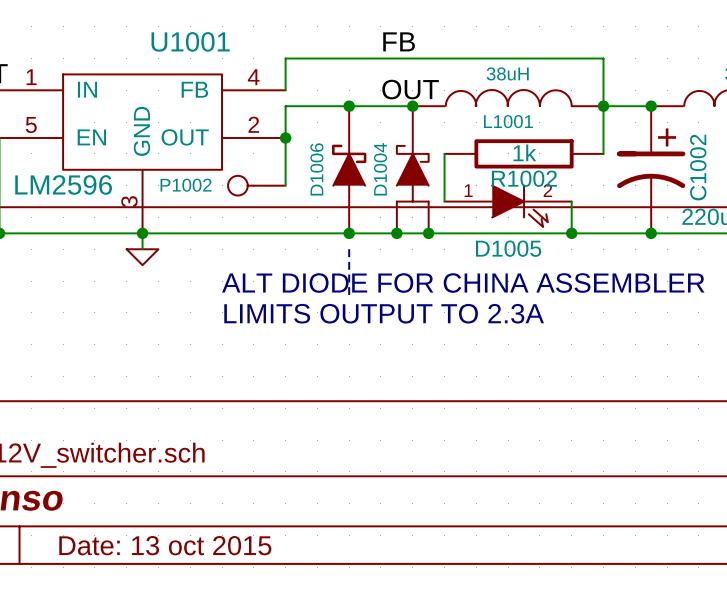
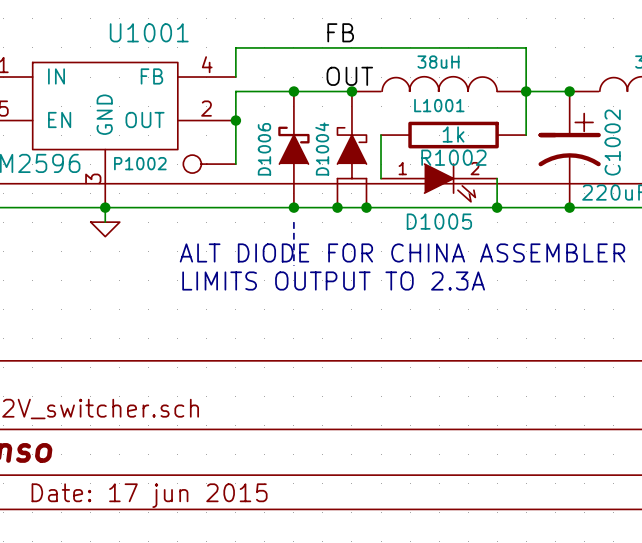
title block: Date: 13 oct 2015 (165, 545) -> Date: 17 jun 2015 (149, 495)

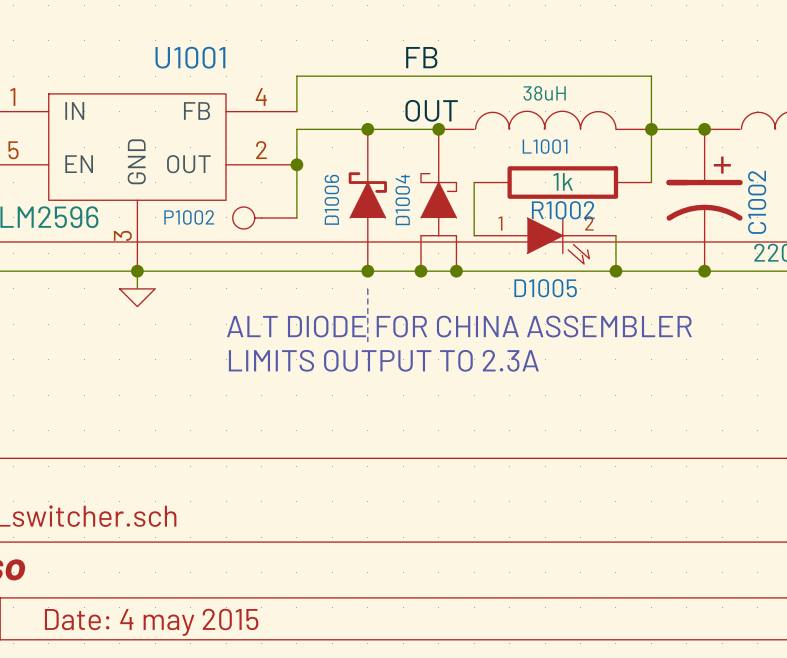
title block: Date: 17 jun 2015 (149, 495) -> Date: 4 may 2015 (151, 622)

